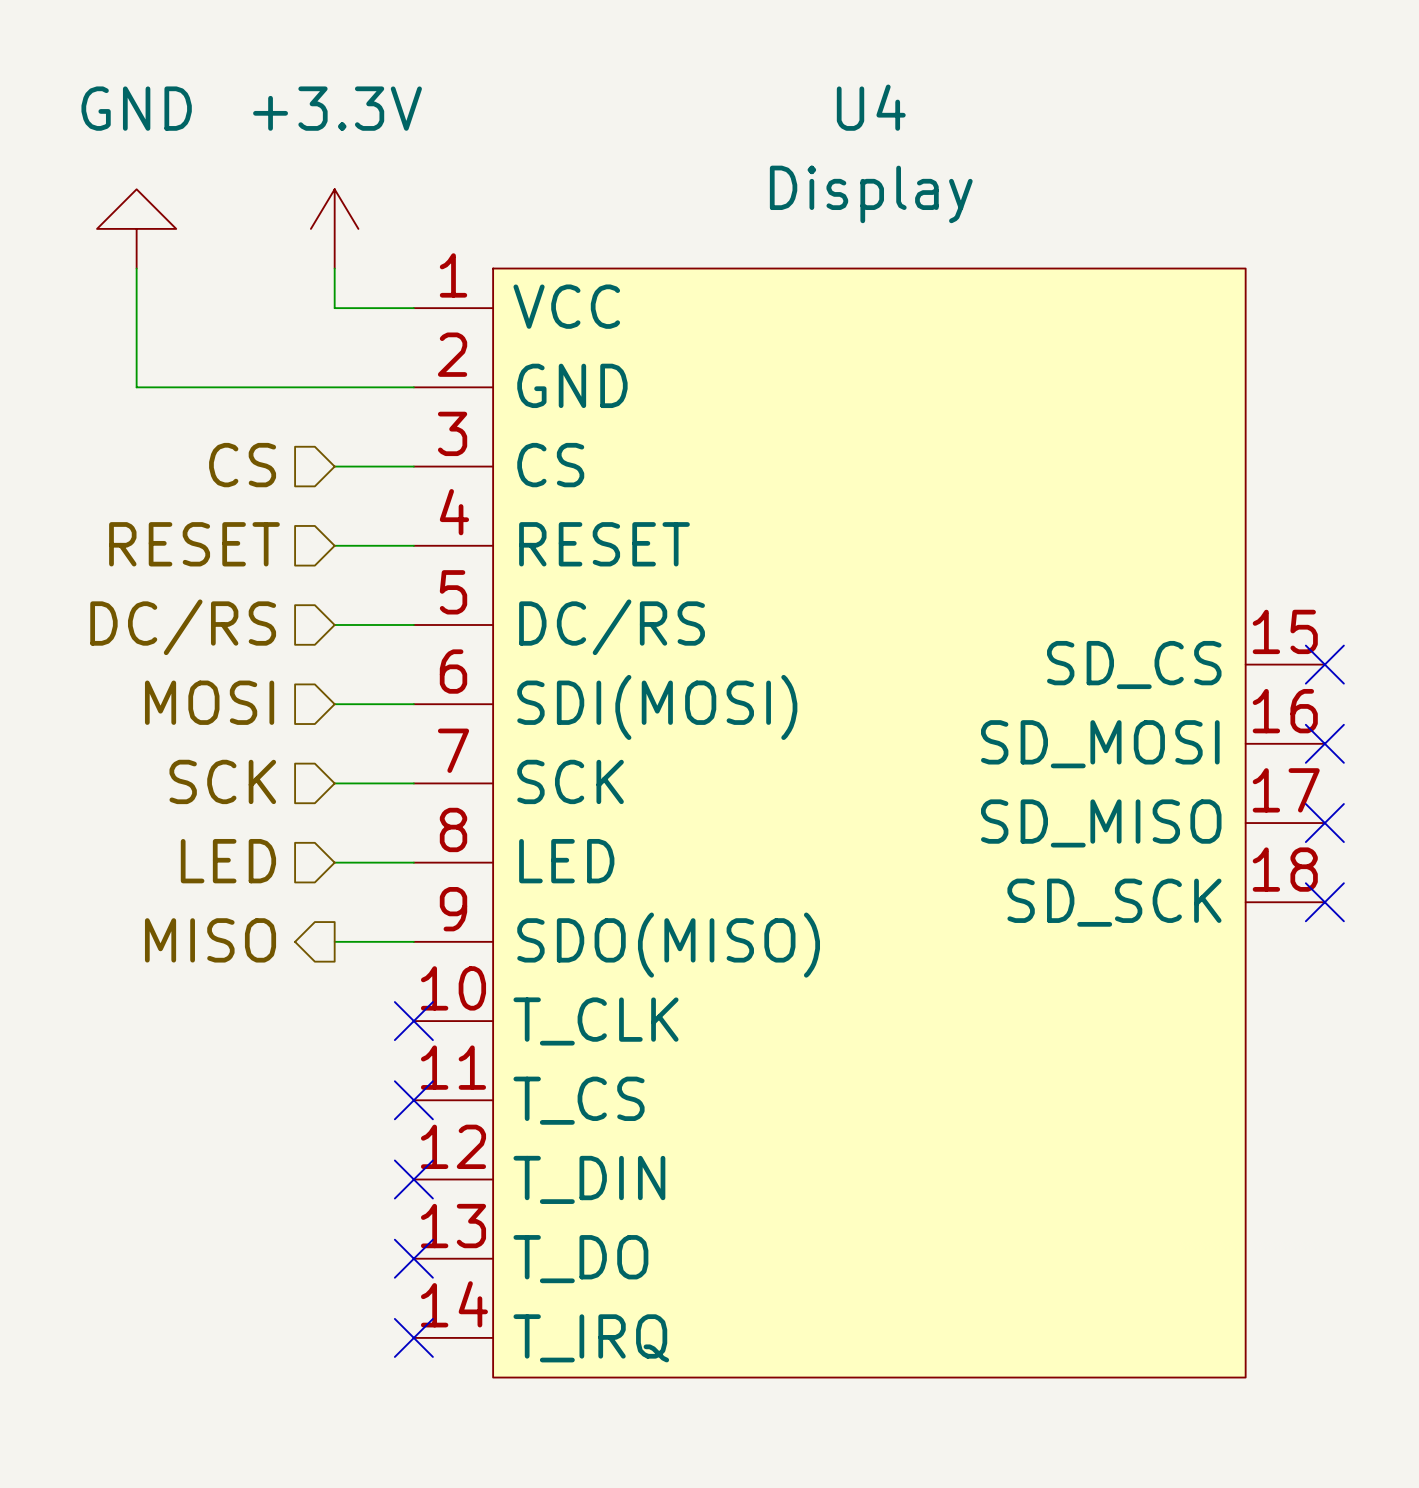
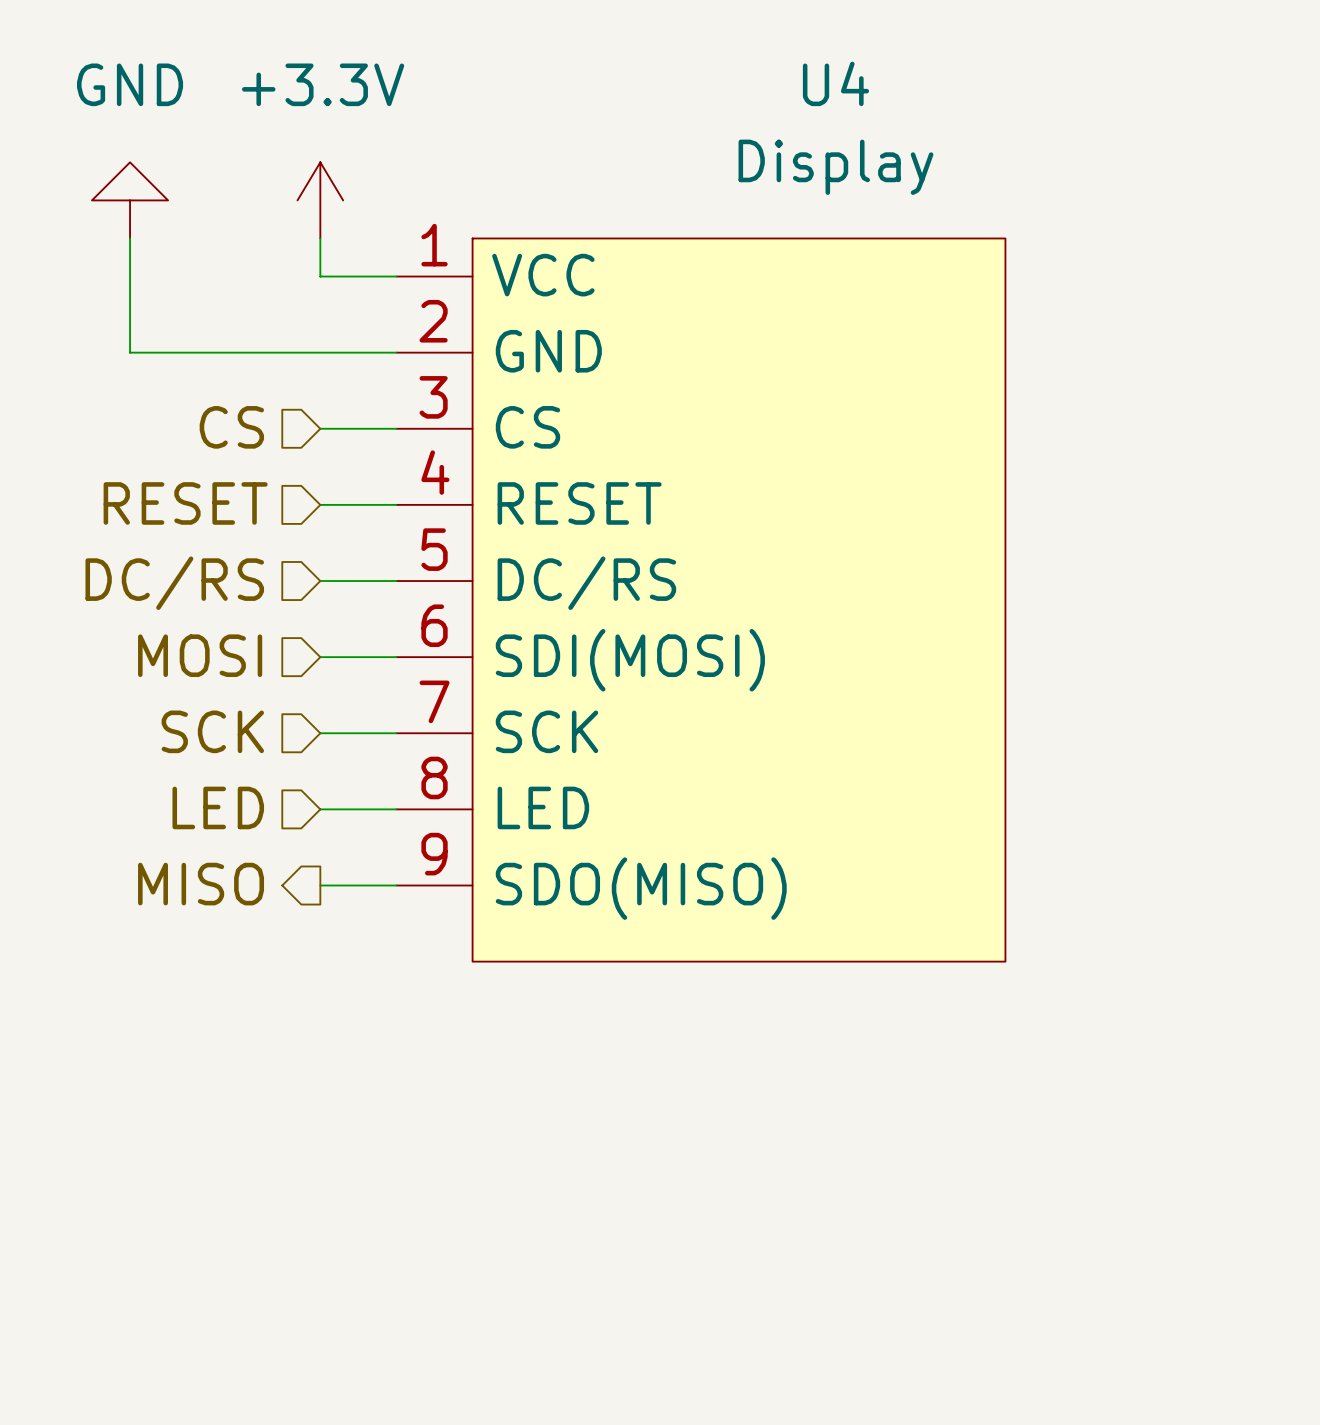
U4 symbol: [413, 268, 1325, 1378] -> [396, 238, 1006, 962]
no-connect mark: (1324, 664) -> none
no-connect mark: (1324, 743) -> none
no-connect mark: (1324, 823) -> none
no-connect mark: (1324, 902) -> none
no-connect mark: (413, 1021) -> none
no-connect mark: (413, 1100) -> none
no-connect mark: (413, 1179) -> none
no-connect mark: (413, 1258) -> none
no-connect mark: (413, 1337) -> none

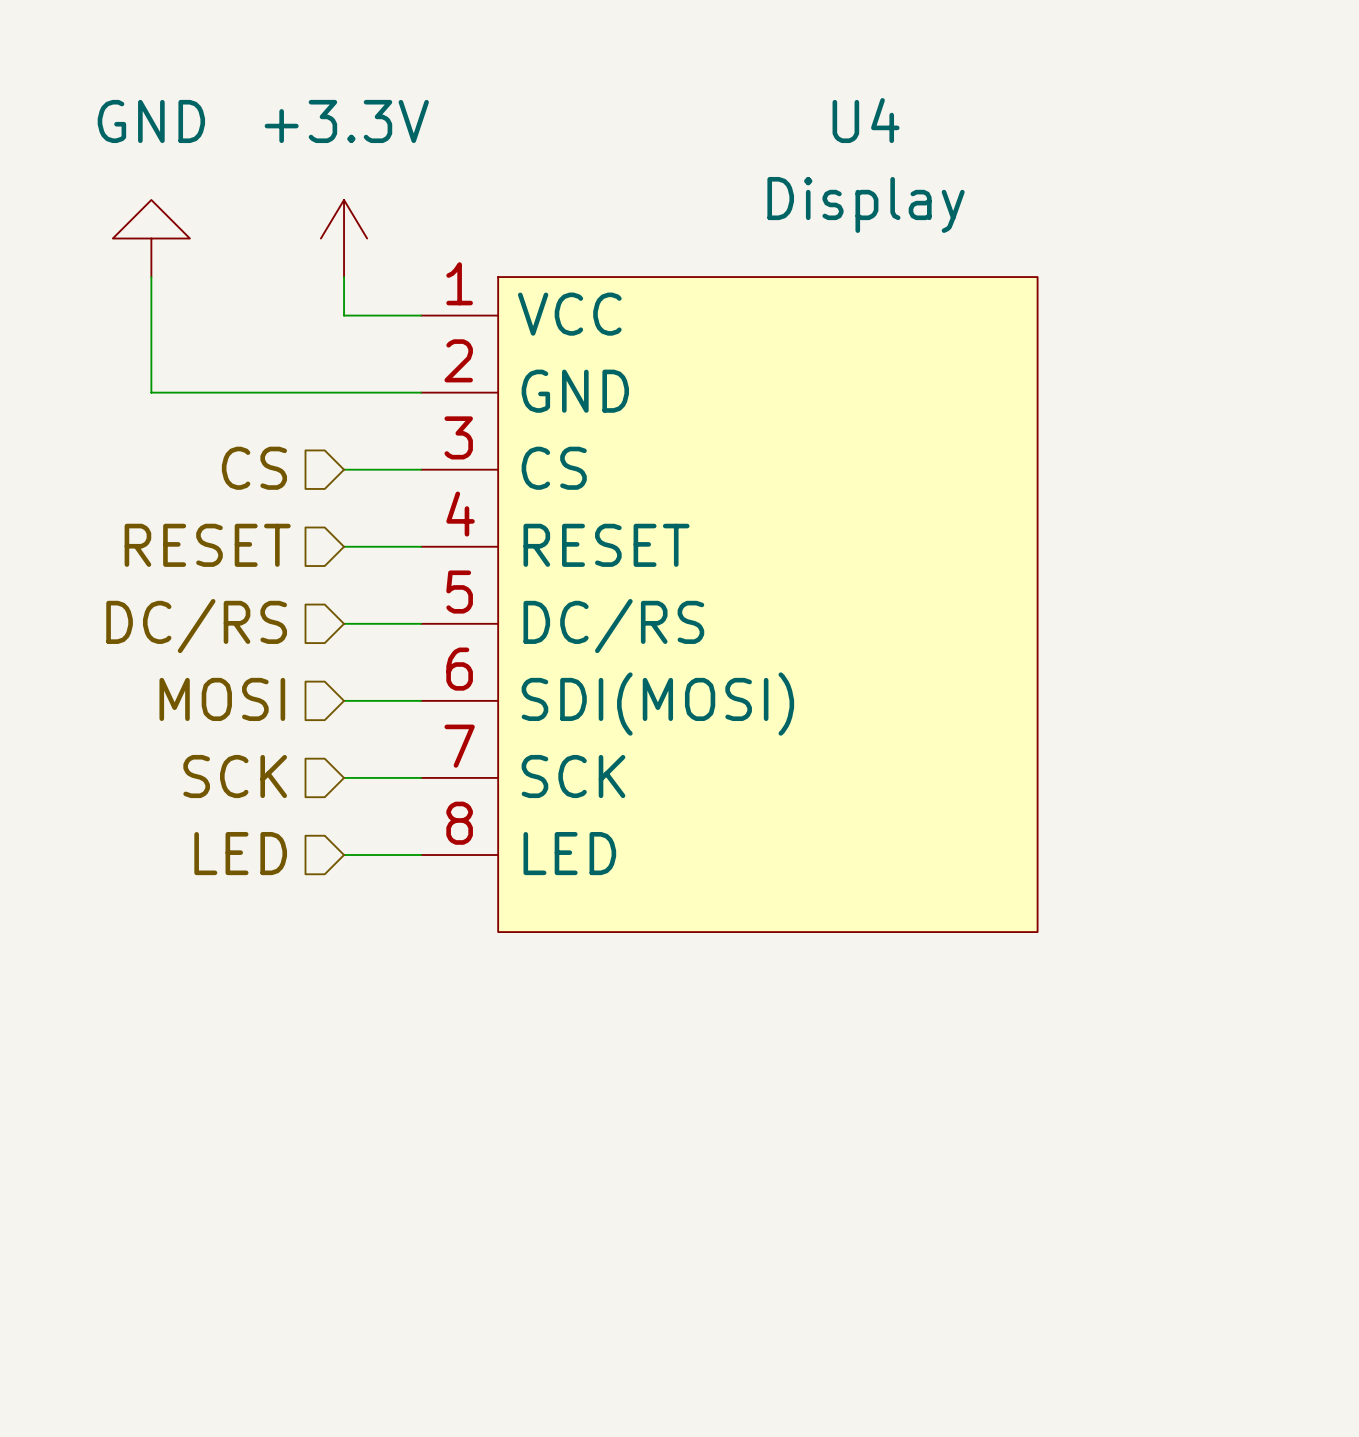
U4 symbol: [396, 238, 1006, 962] -> [421, 277, 1038, 933]
hierarchical label: MISO (201, 884) -> none
wire: (320, 885) (396, 885) -> none

